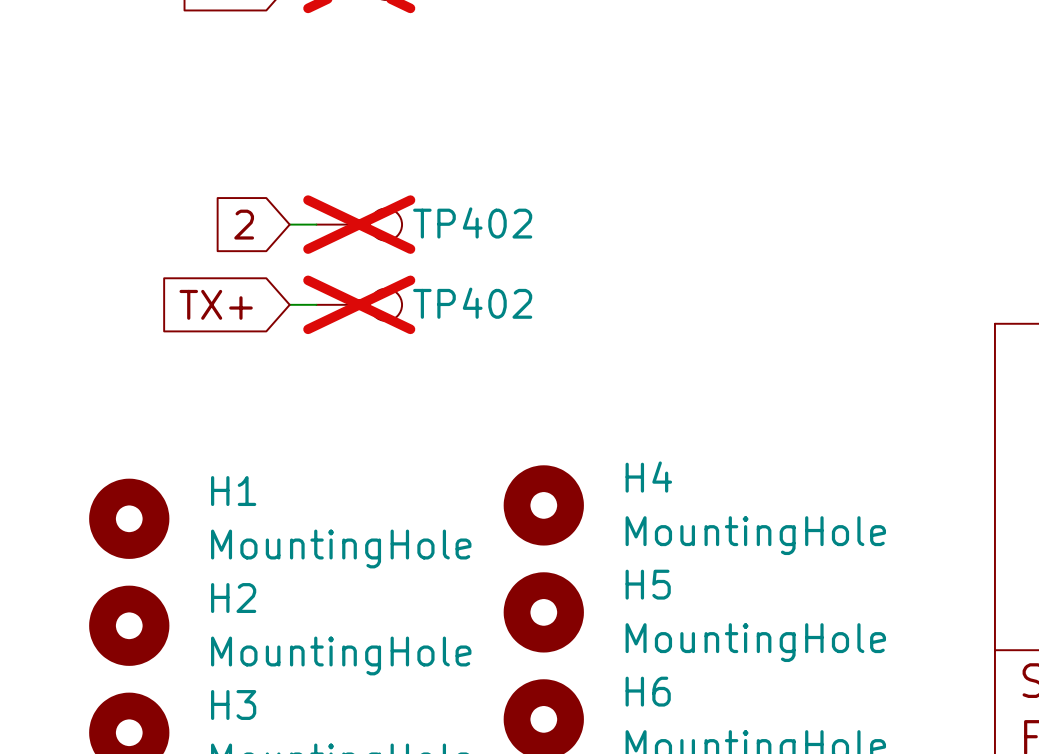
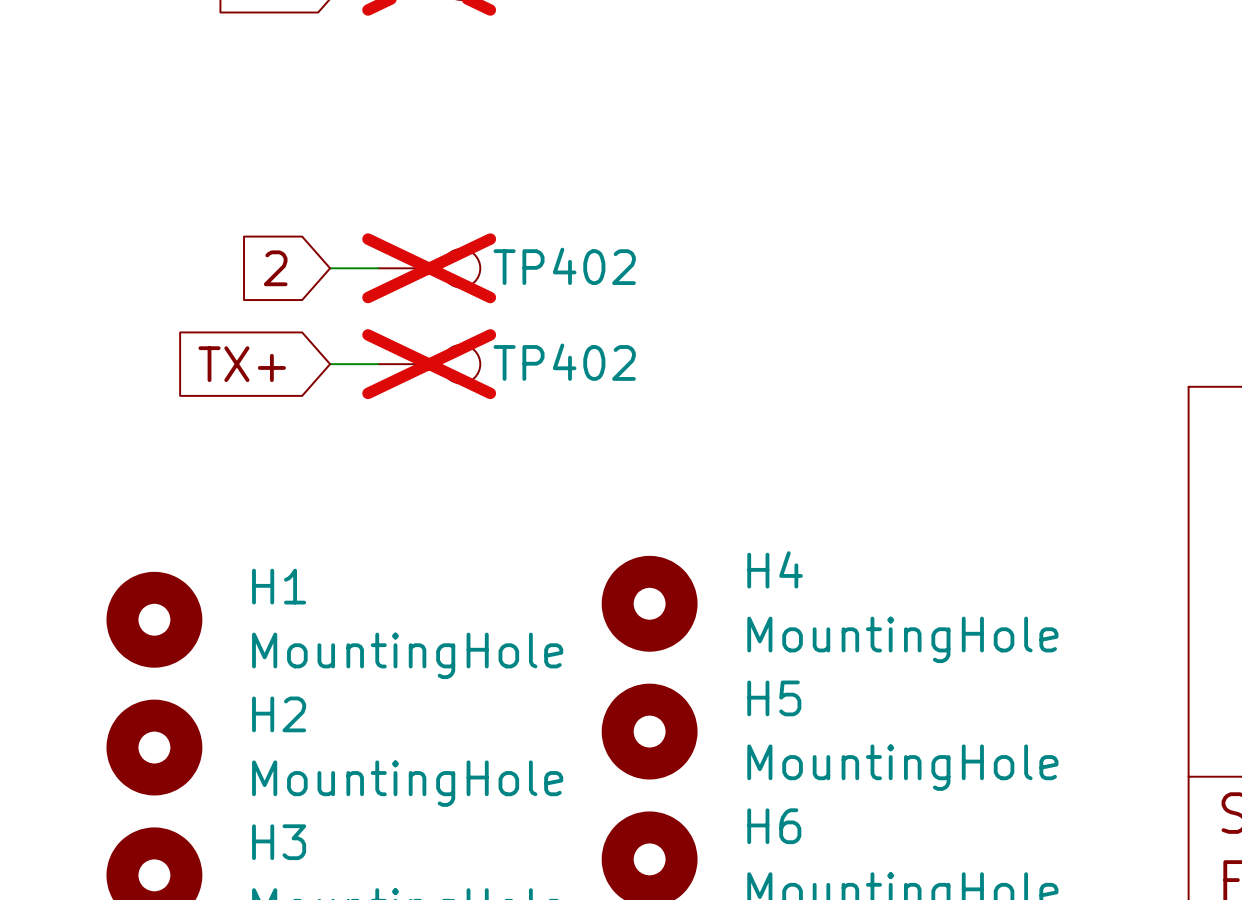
global label position: 2 (244, 224) -> 2 (275, 268)
wire: none -> (330, 268) (346, 268)
global label position: TX+ (216, 304) -> TX+ (242, 364)
wire: none -> (330, 364) (346, 364)

